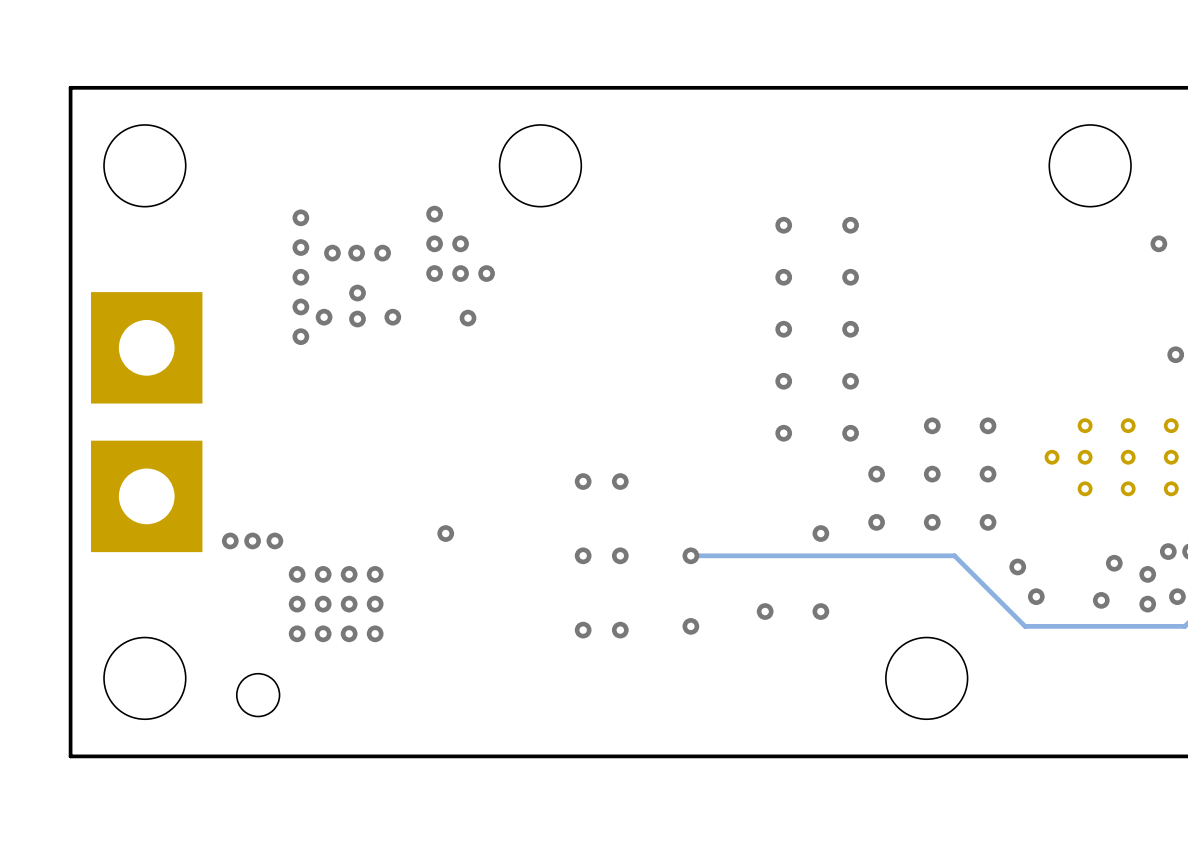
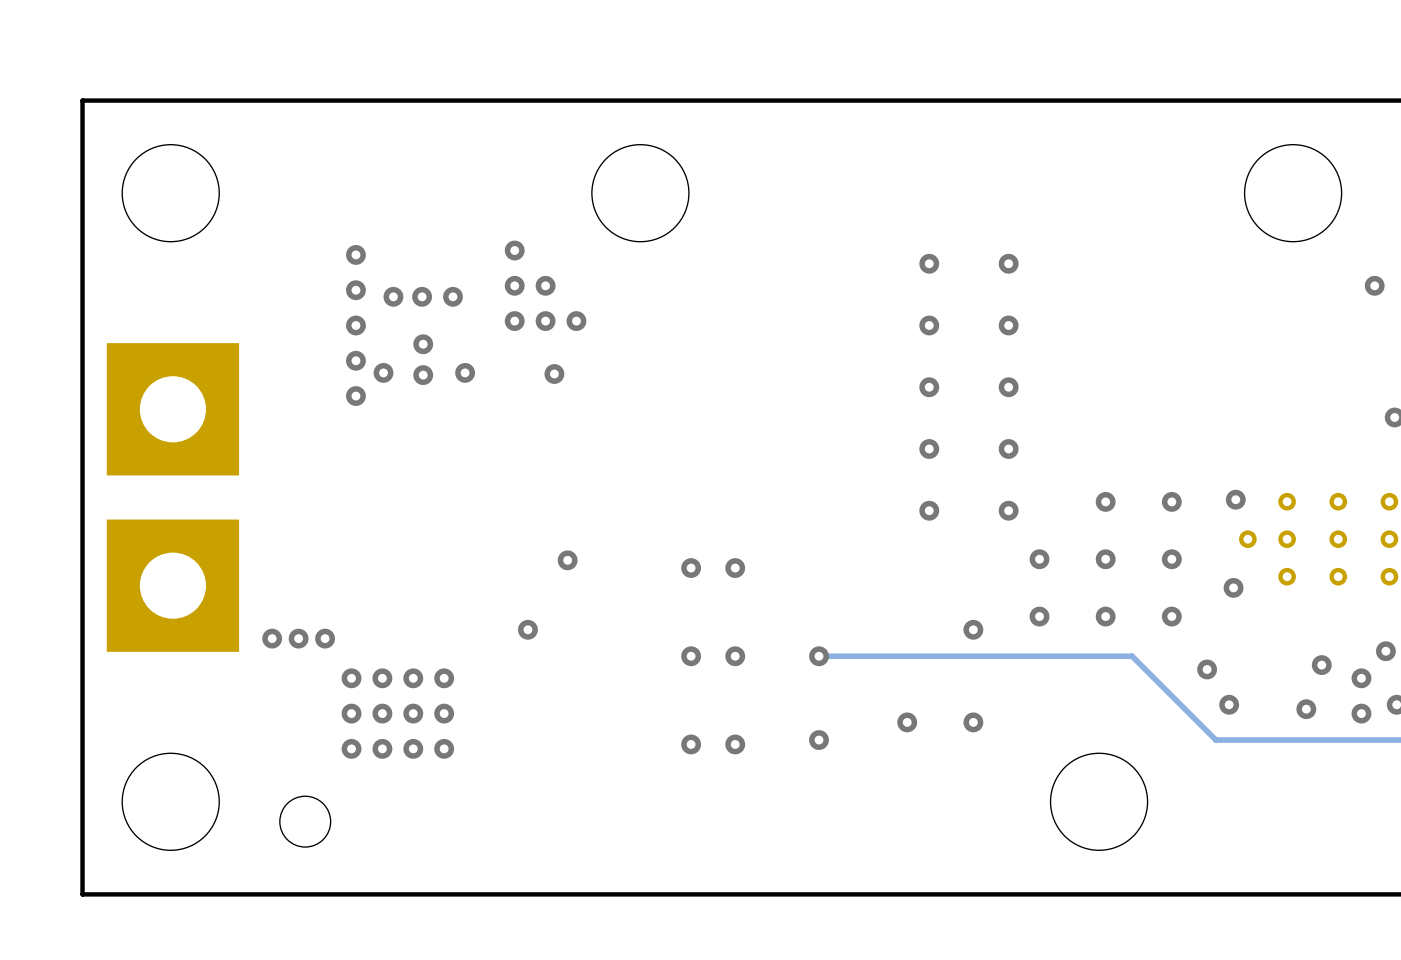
via: none -> (1235, 499)
via: none -> (567, 560)
via: none -> (1233, 587)

